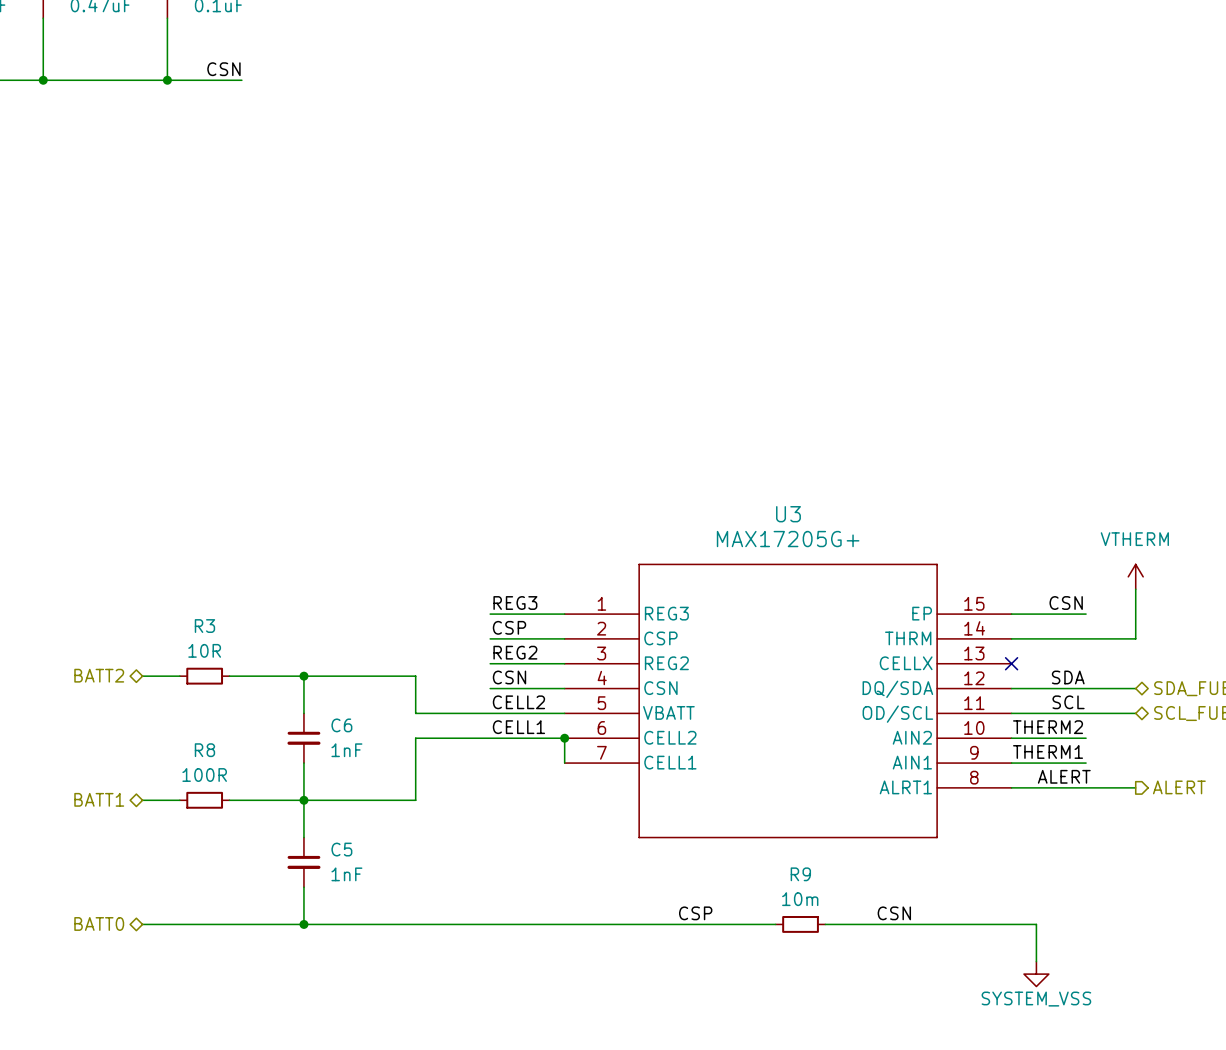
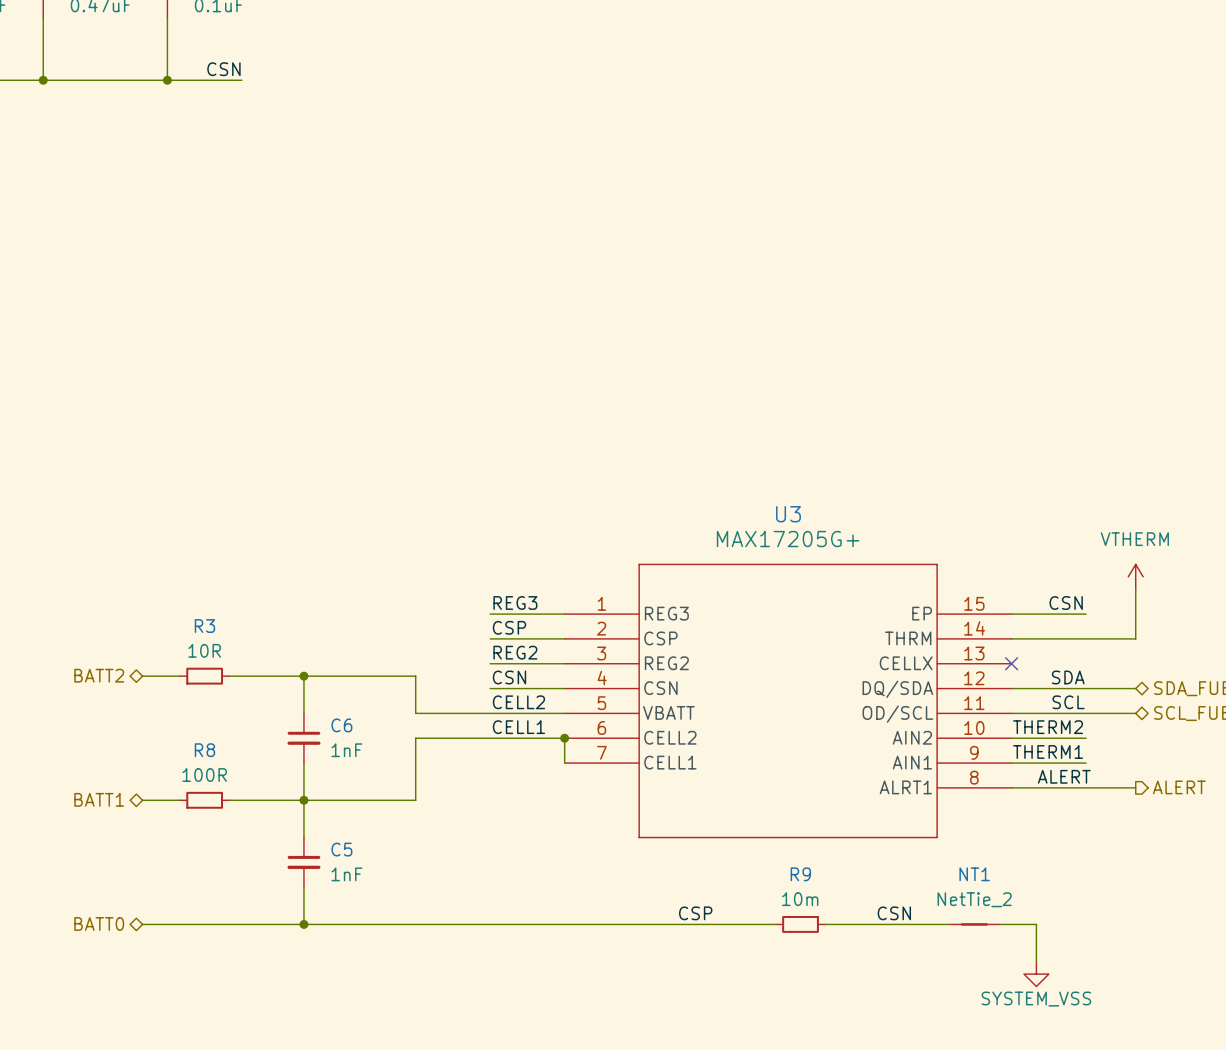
NT1: none -> NetTie_2 (974, 924)

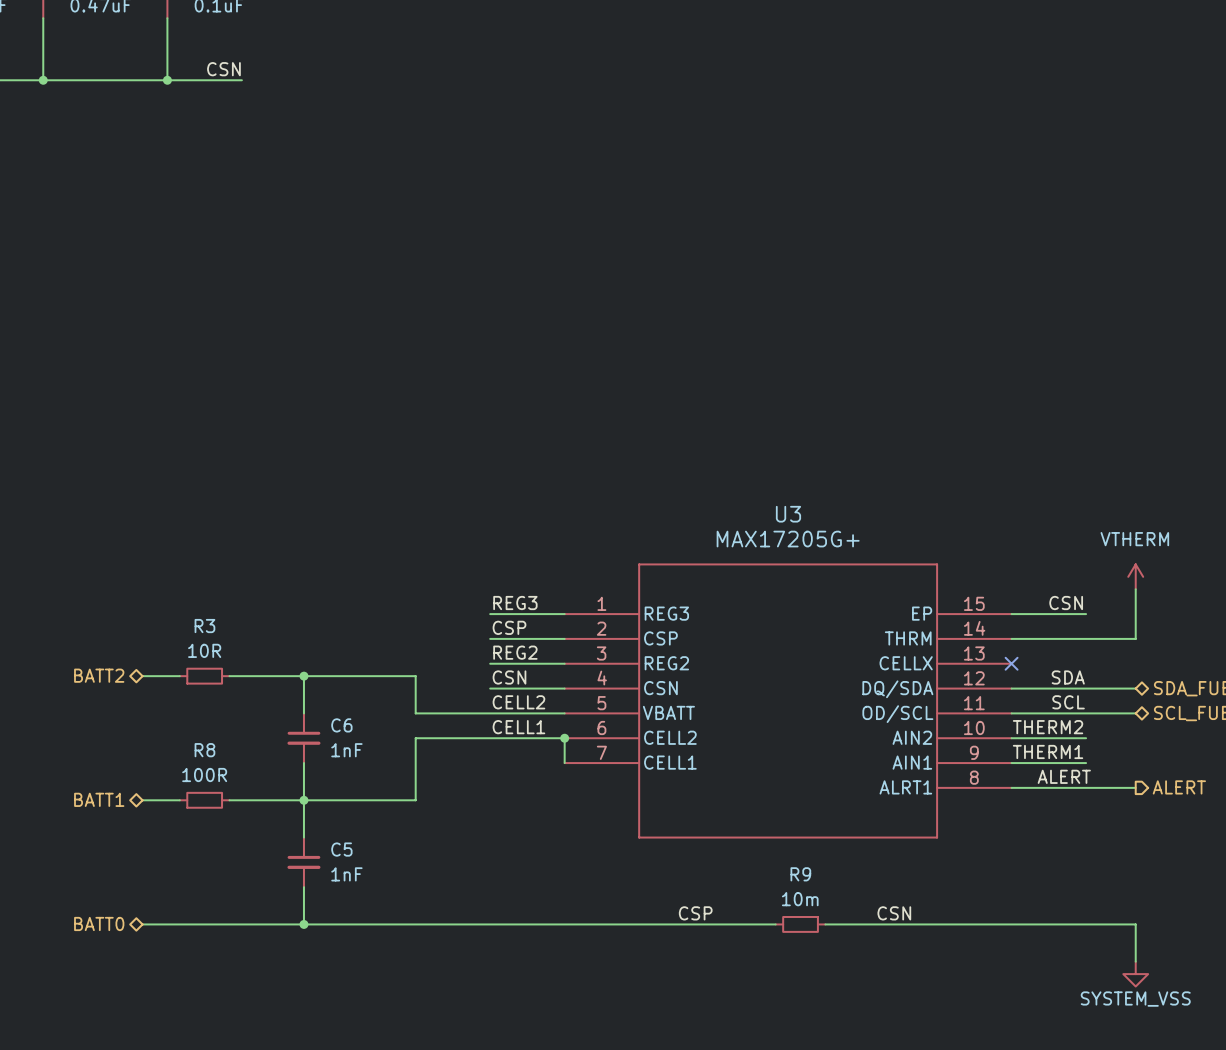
NT1: NetTie_2 (974, 924) -> none
wire: (1036, 924) (1036, 961) -> (1036, 924) (1135, 924) (1135, 961)
power symbol position: SYSTEM_VSS (1036, 974) -> SYSTEM_VSS (1135, 974)

